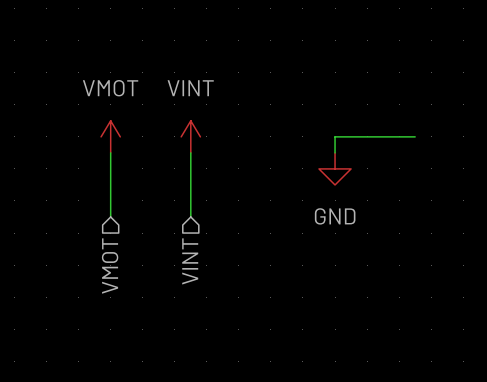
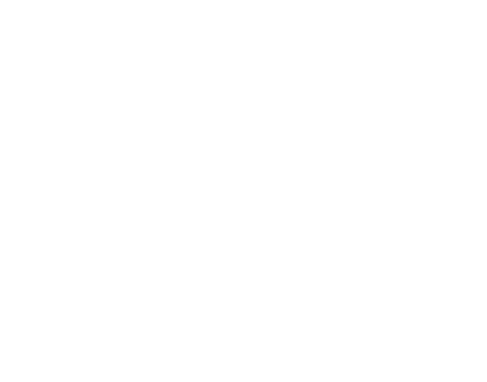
power symbol: VMOT (110, 136) -> none
power symbol: VINT (190, 136) -> none
wire: (415, 136) (335, 136) (335, 152) -> none
wire: (110, 152) (110, 217) -> none
wire: (190, 152) (190, 217) -> none
power symbol: GND (335, 168) -> none
hierarchical label: VINT (190, 261) -> none
hierarchical label: VMOT (110, 266) -> none

